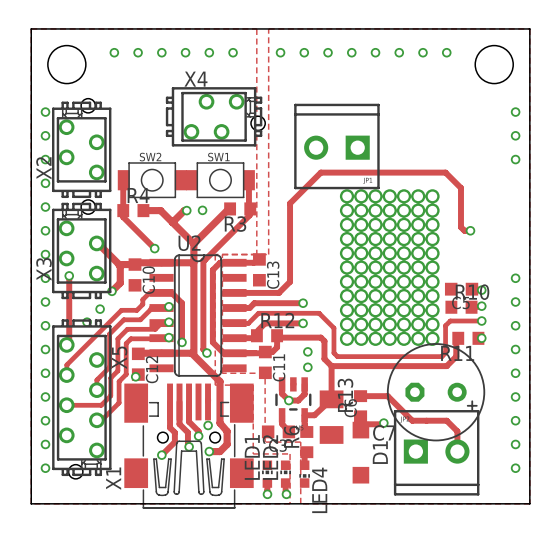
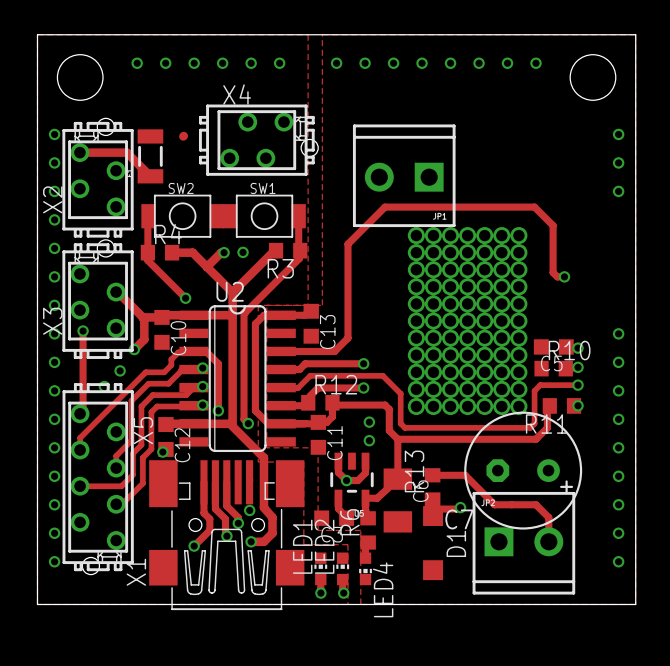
track: none -> (183, 136) (183, 136)
track: none -> (79, 152) (126, 152) (150, 176)
part: none -> (150, 156)

